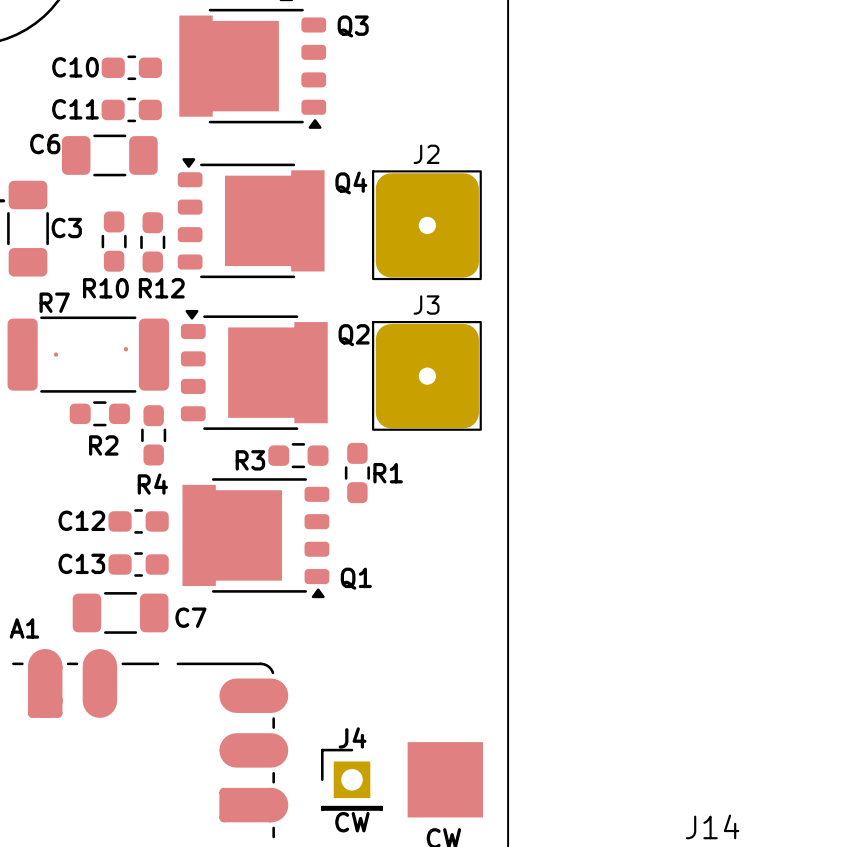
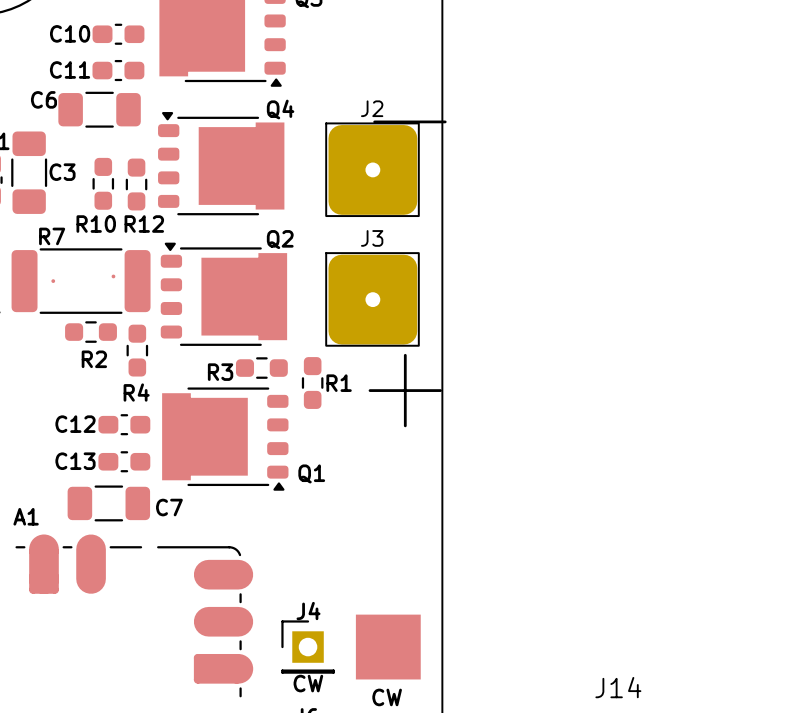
text: none -> - (409, 121)
Q4 name position: Q4 (351, 182) -> Q4 (280, 109)
Q2 name position: Q2 (354, 335) -> Q2 (280, 239)
text: none -> + (405, 390)

